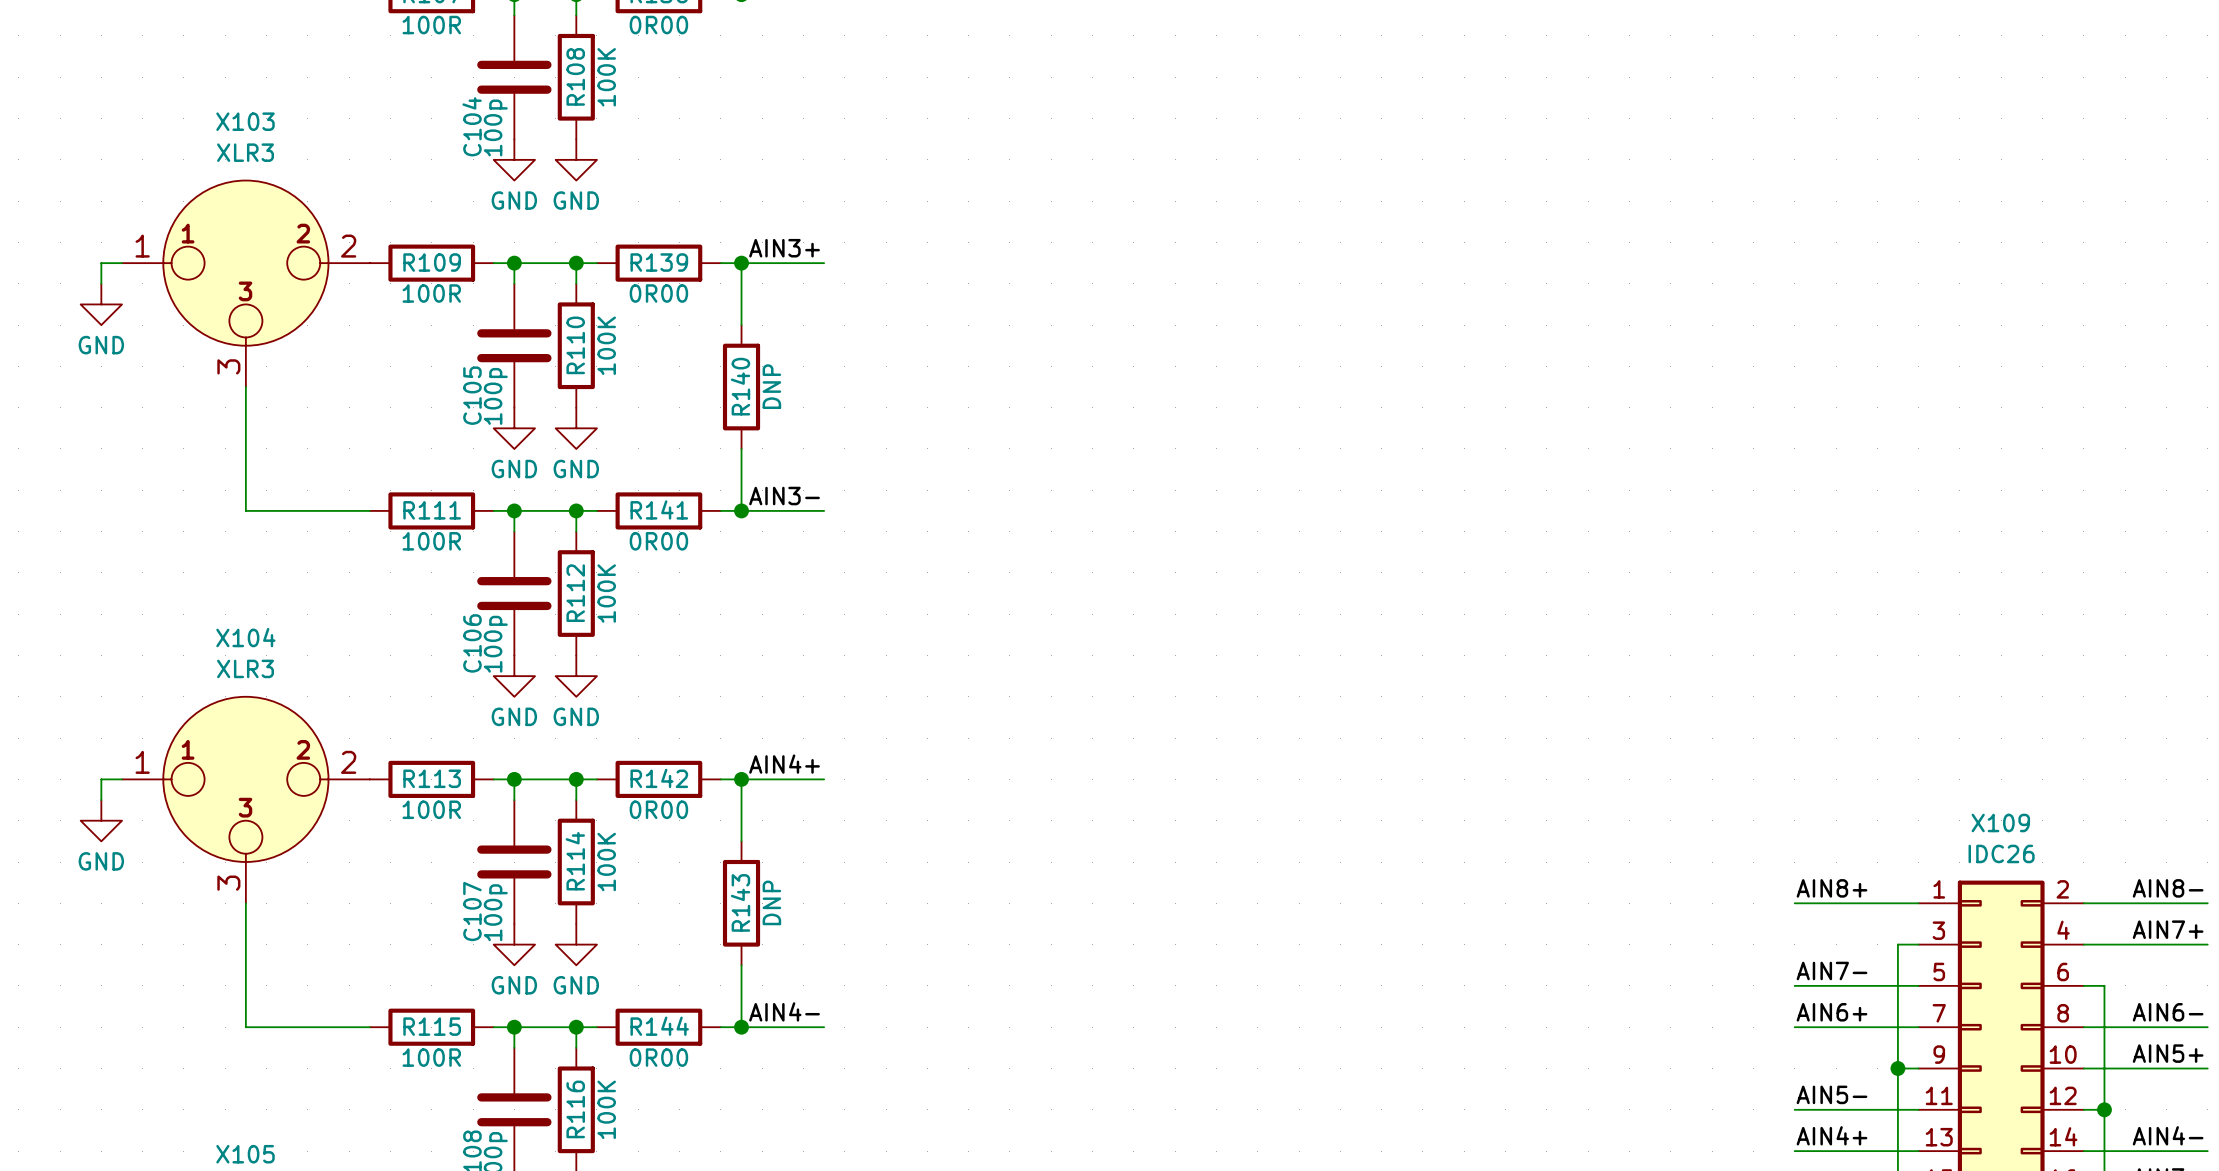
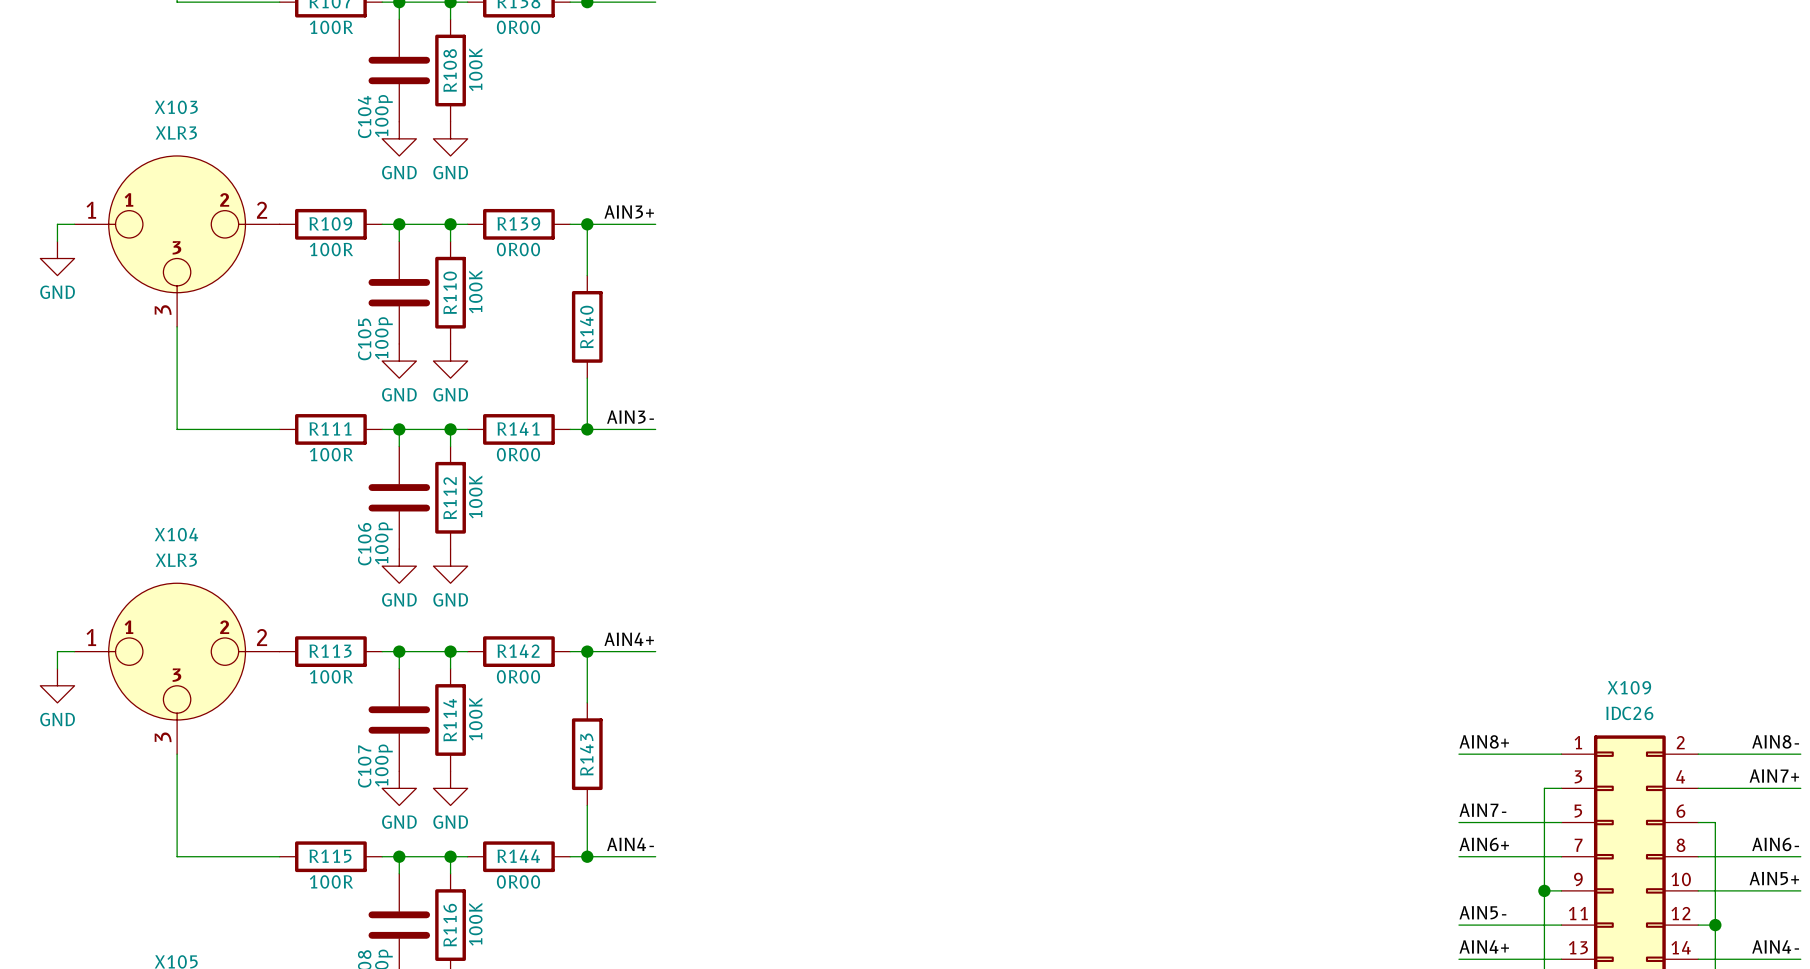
R140 text: DNP (771, 386) -> none
R143 text: DNP (771, 902) -> none

